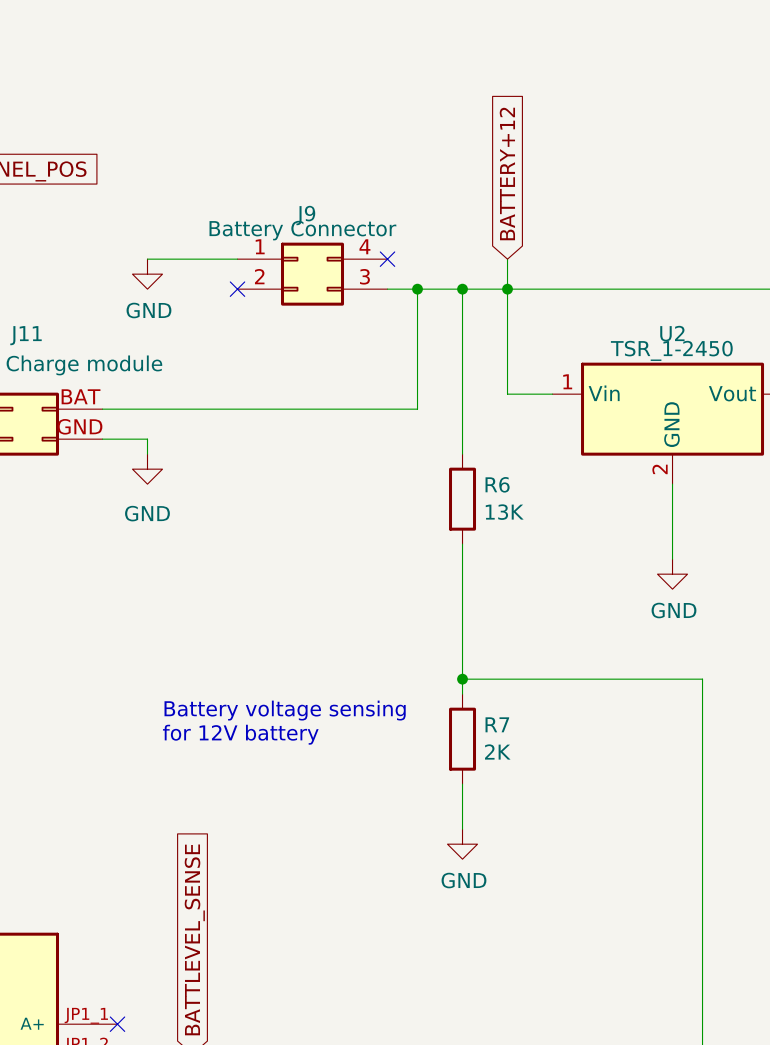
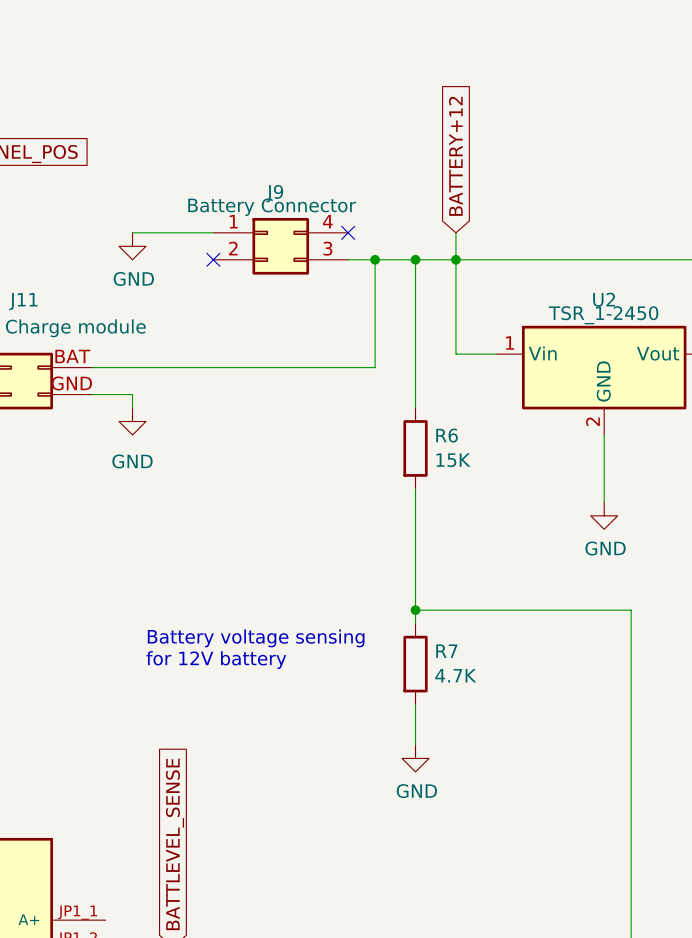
R6 value: 13K (504, 512) -> 15K (453, 460)
R7 value: 2K (497, 751) -> 4.7K (455, 675)
no-connect mark: (117, 1024) -> none

